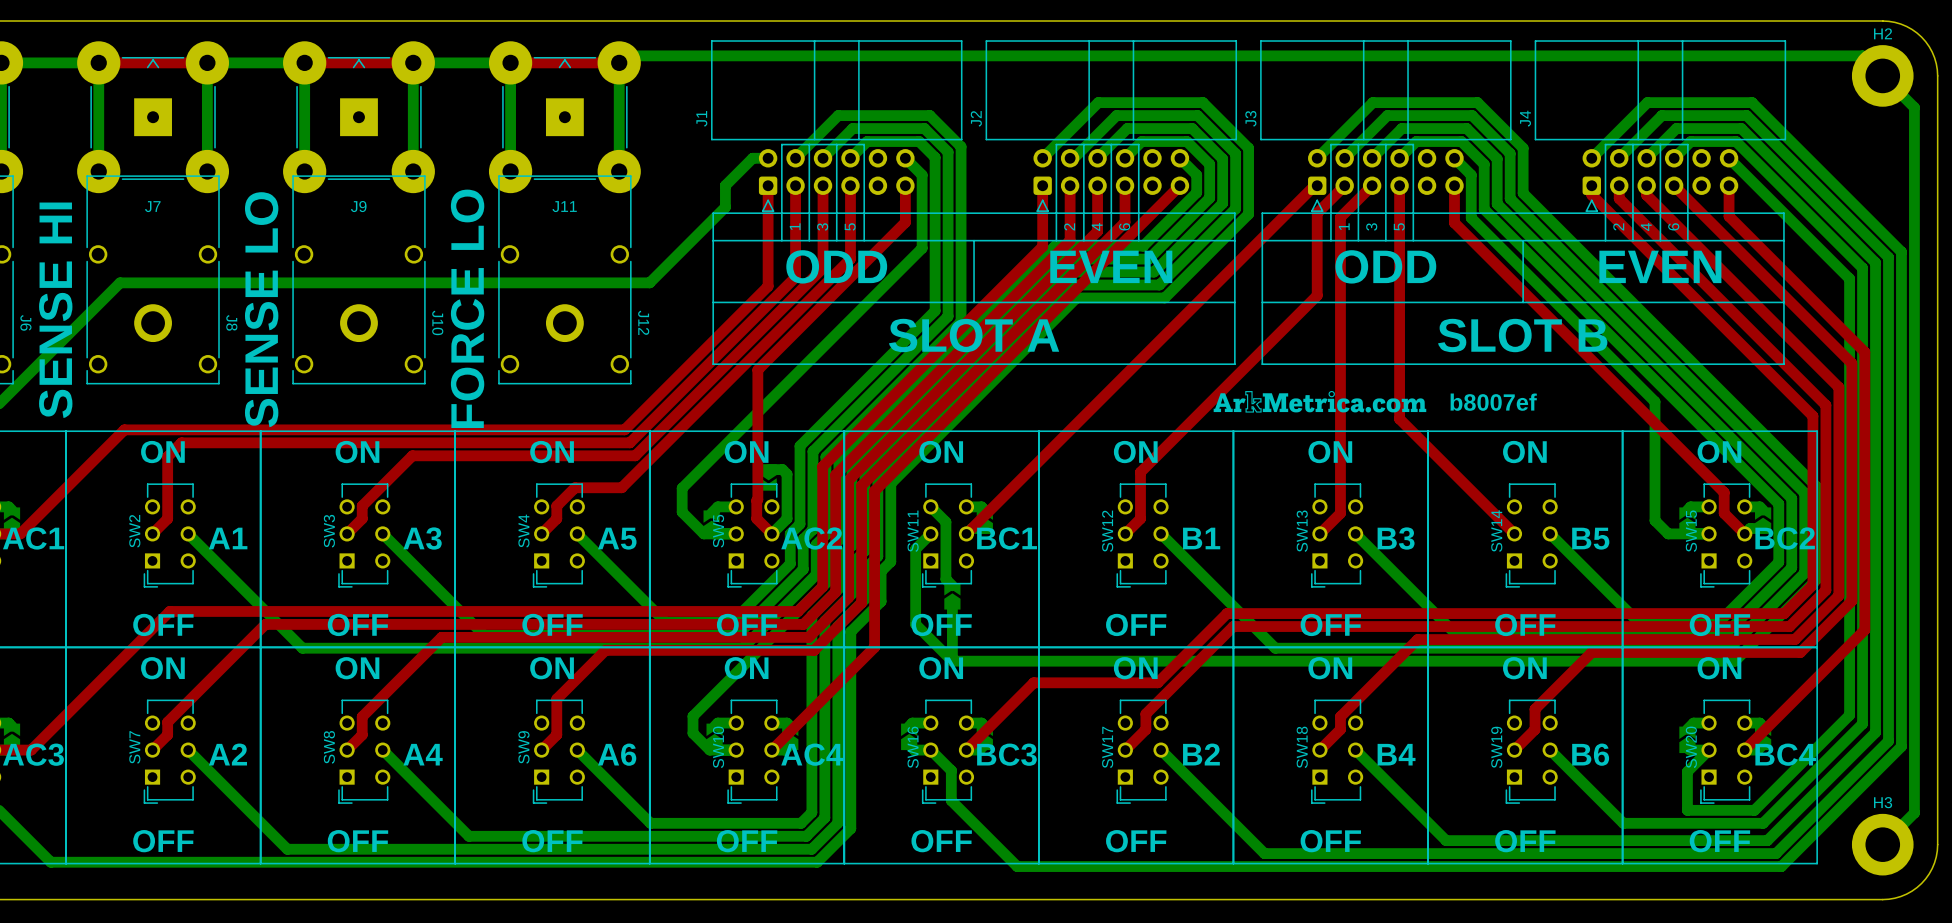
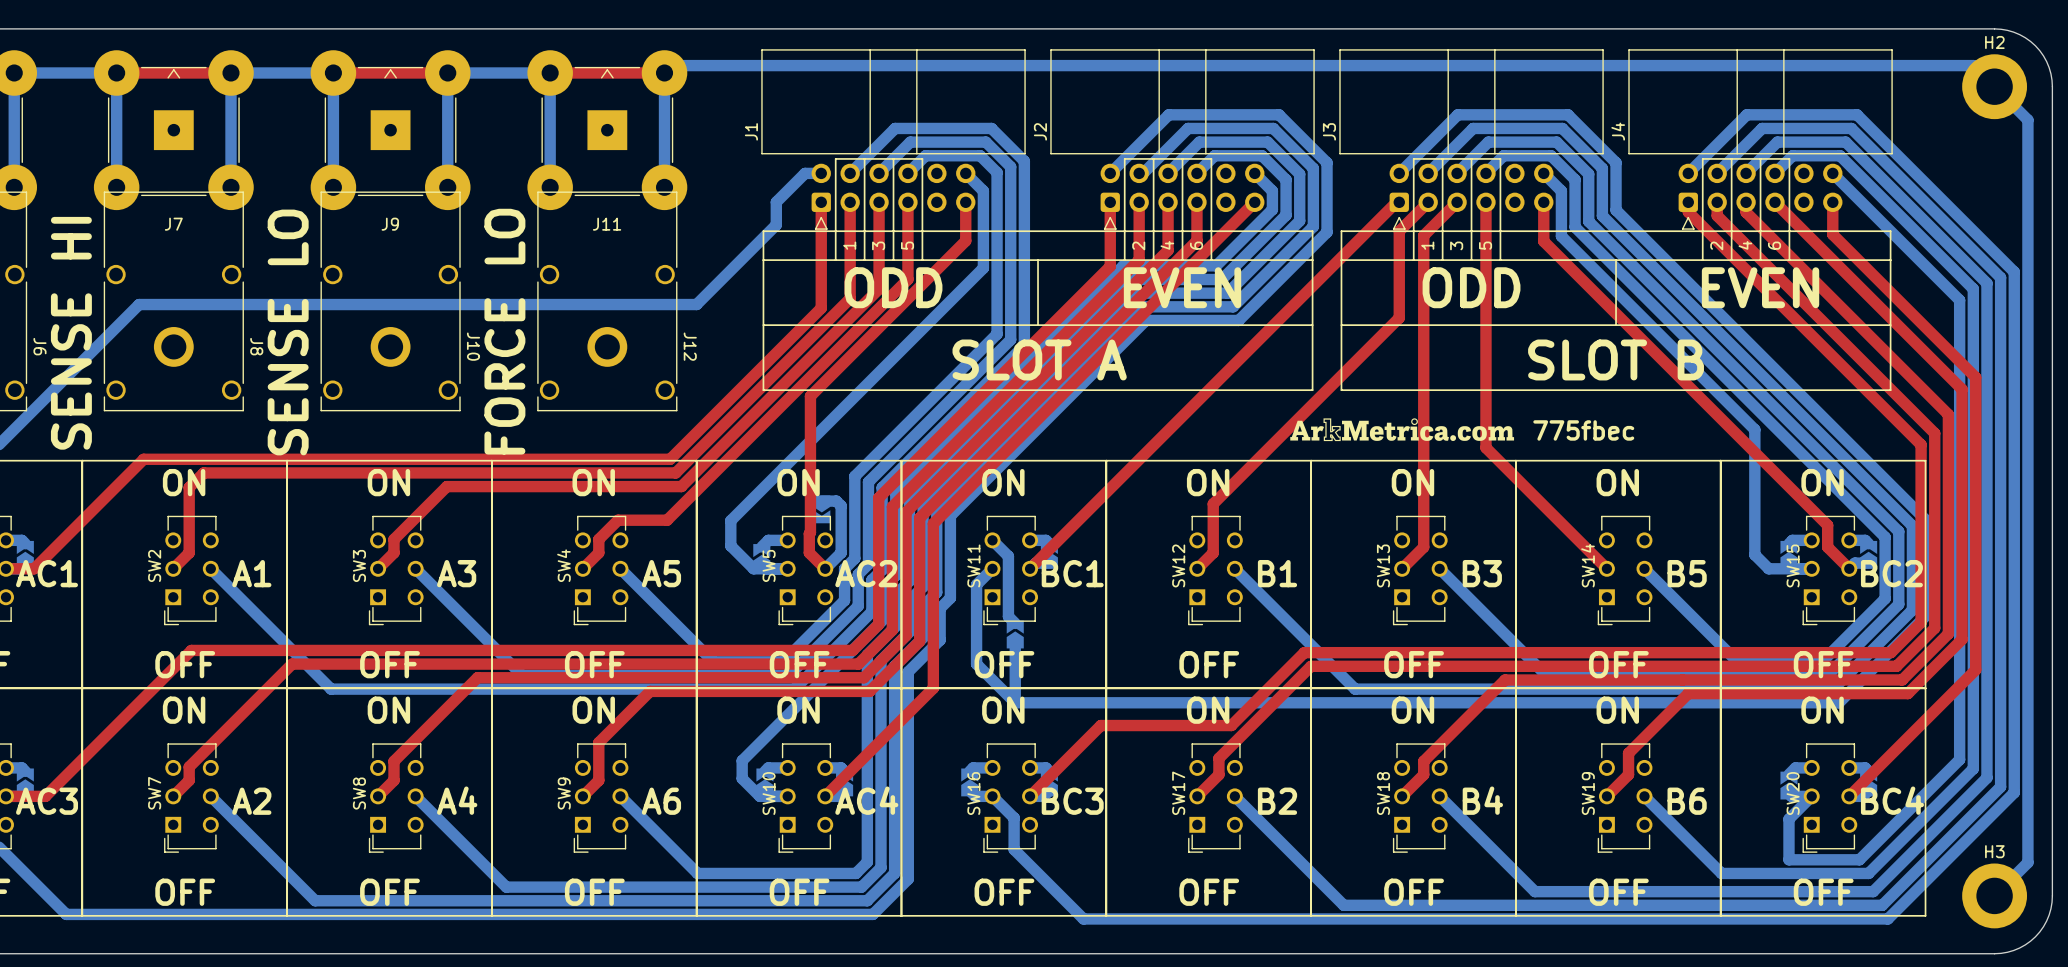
text: b8007ef (1493, 402) -> 775fbec (1583, 430)

